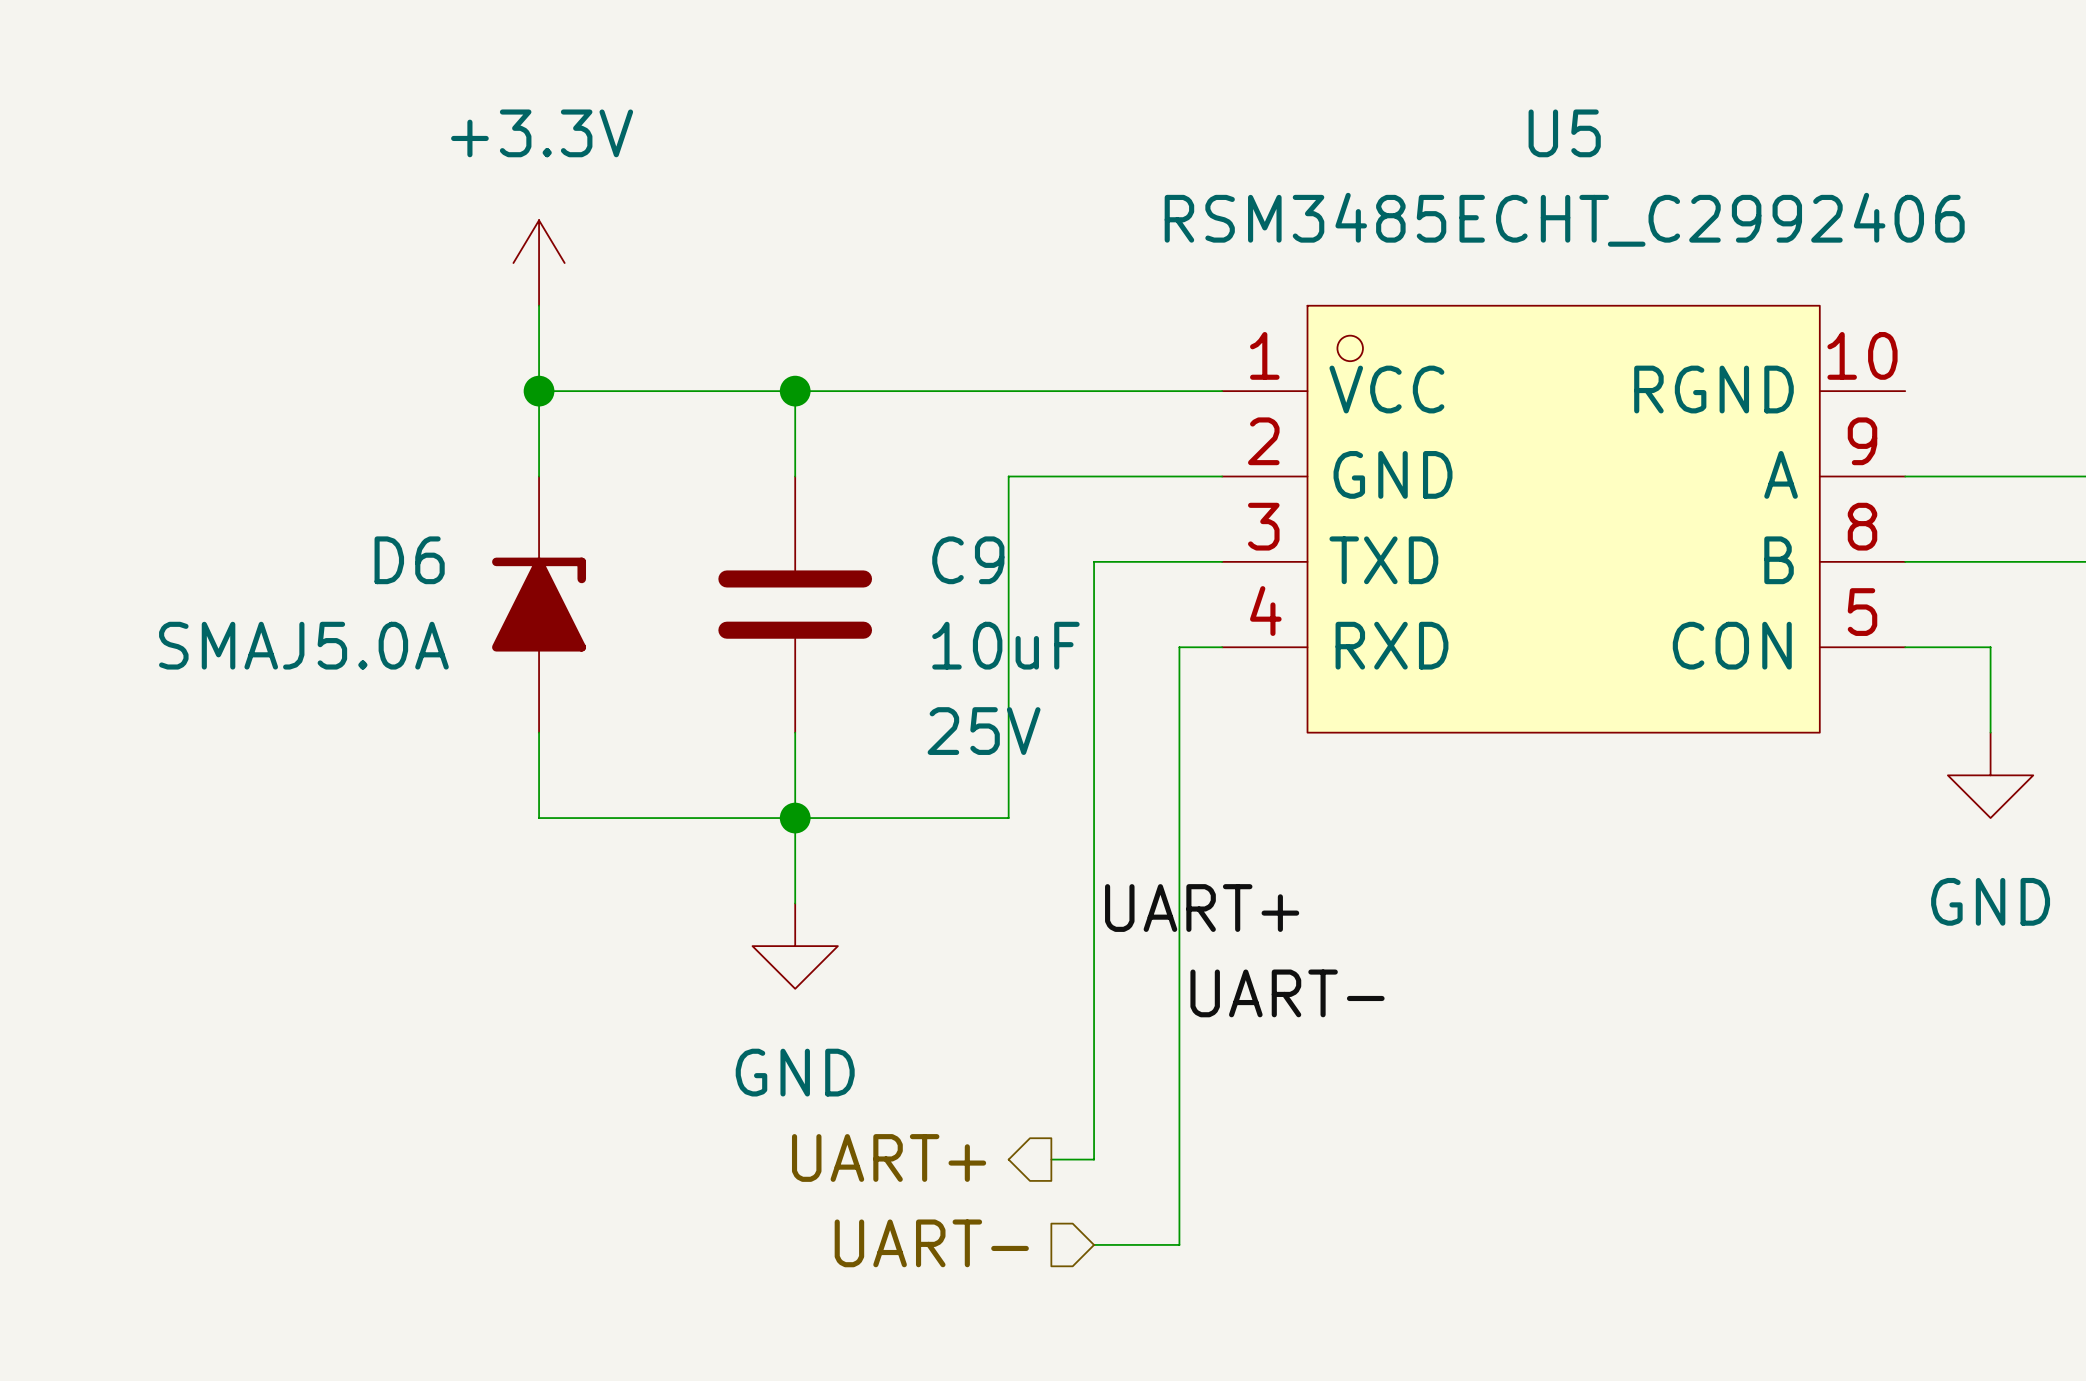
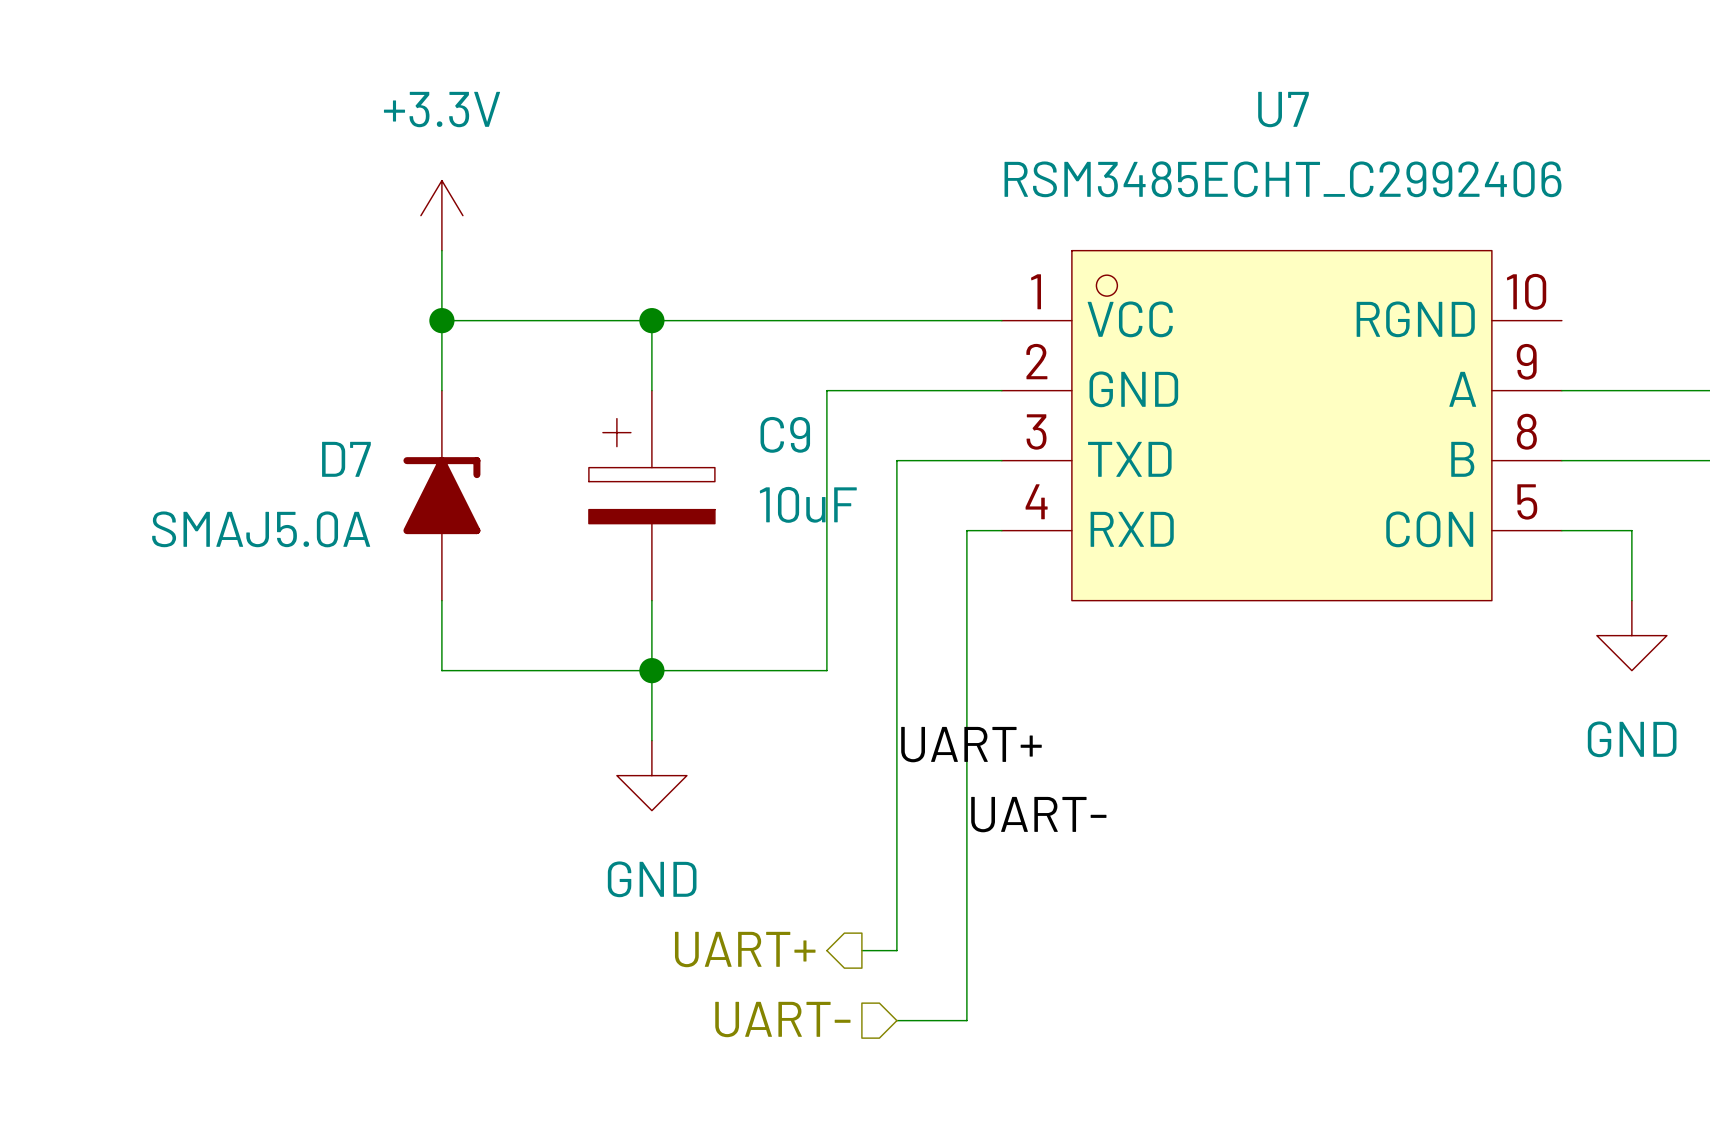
U5 name: U5 (1564, 133) -> U7 (1283, 109)
C9 symbol: [718, 476, 873, 733] -> [588, 390, 715, 601]
D6 name: D6 (409, 560) -> D7 (346, 459)
C9 text: 25V (984, 731) -> none

